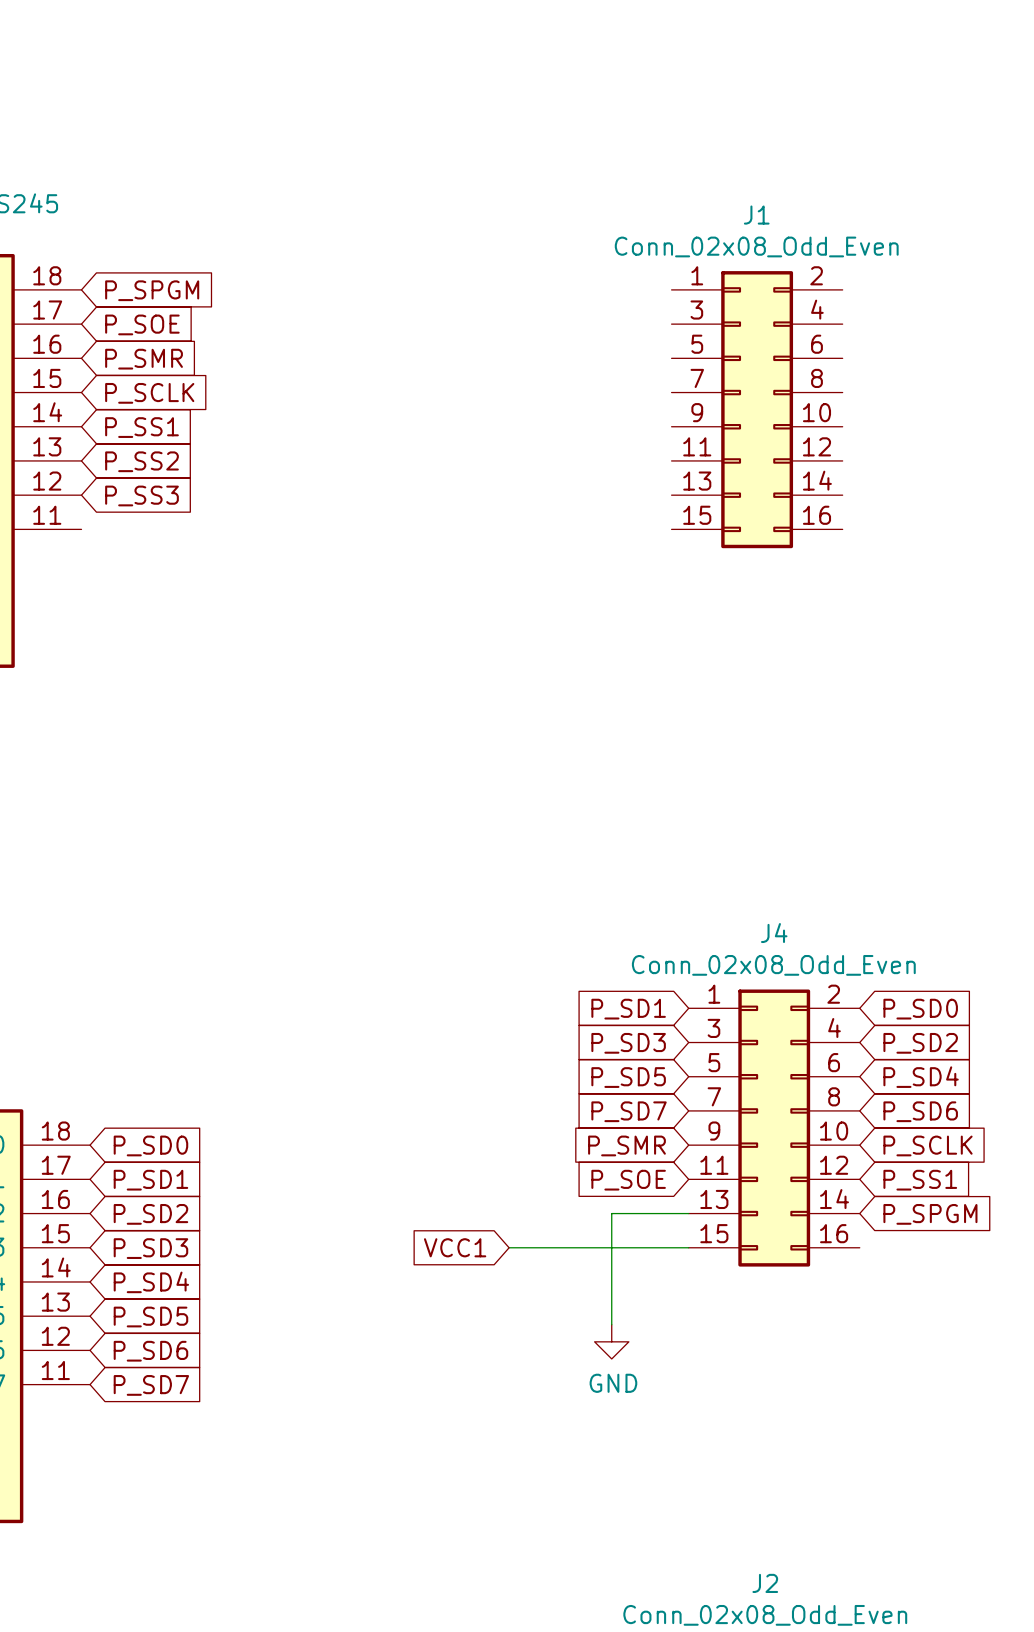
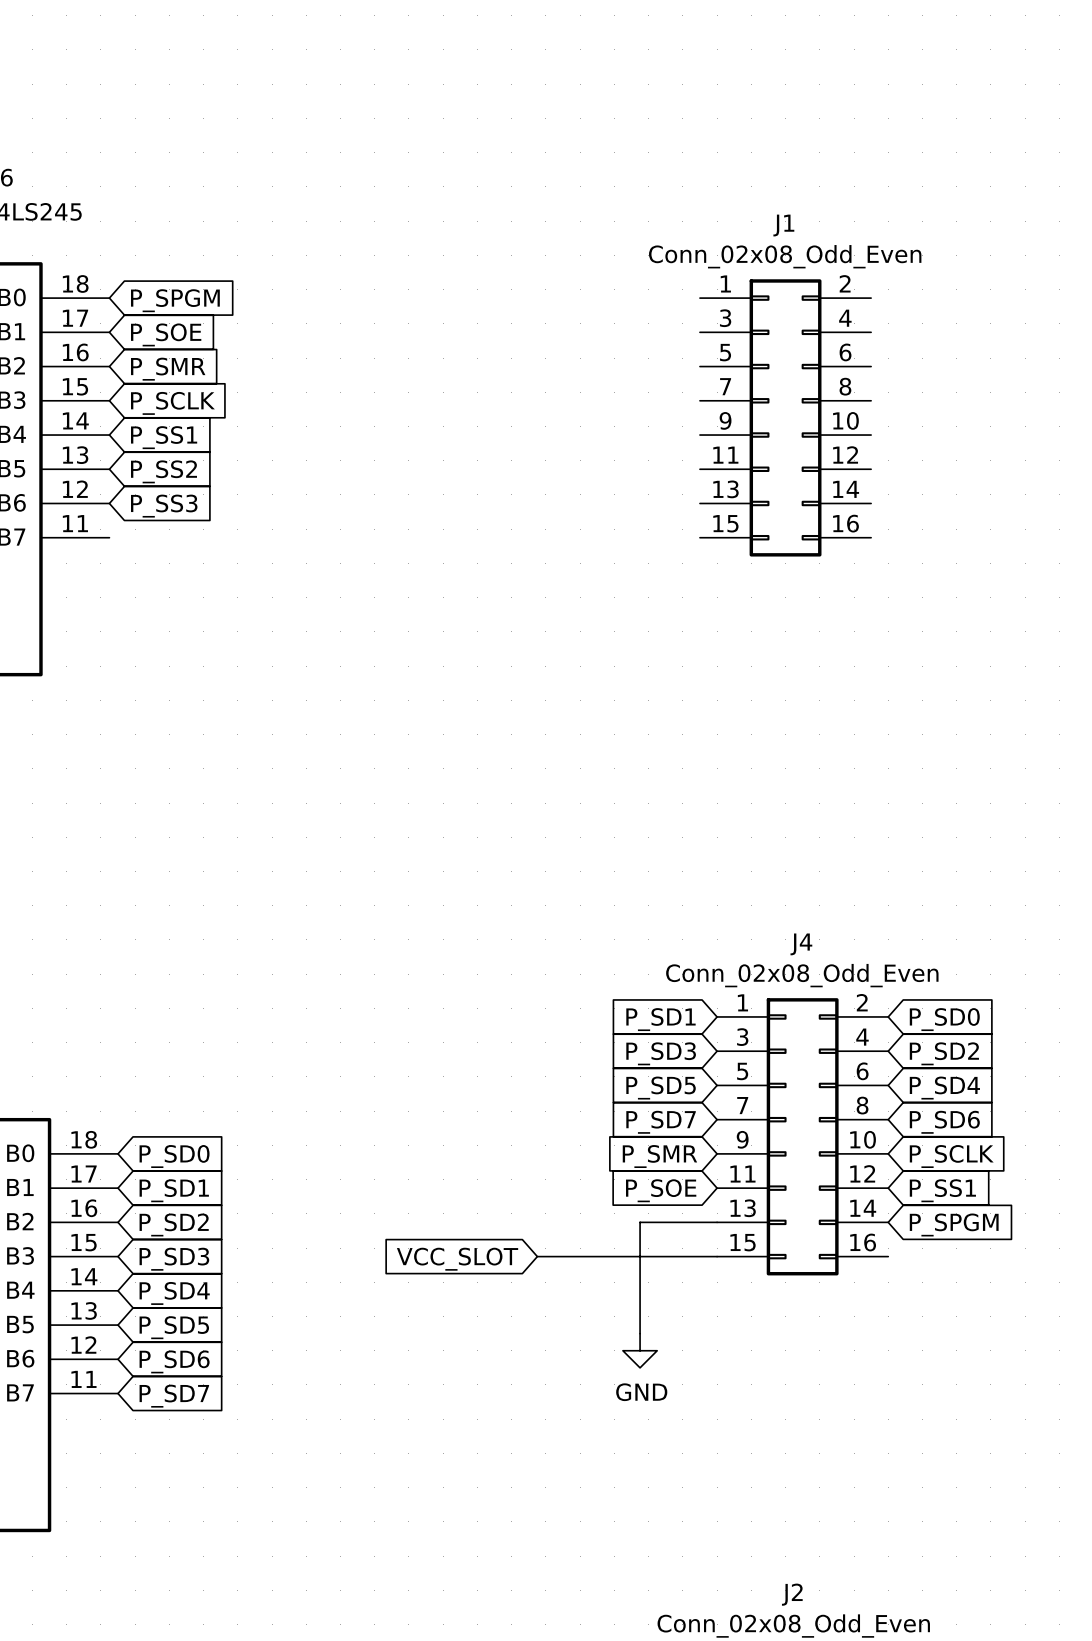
global label: VCC1 (455, 1247) -> VCC_SLOT (457, 1259)

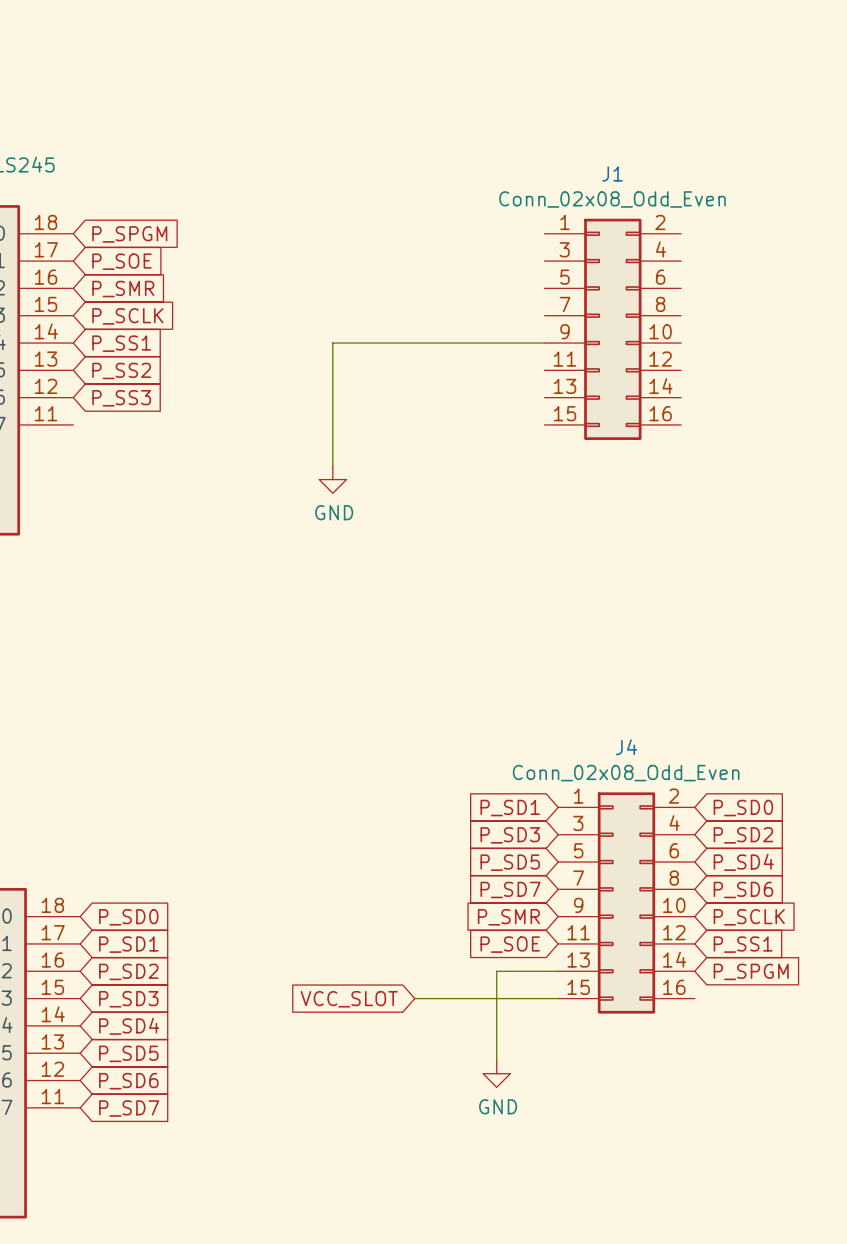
wire: none -> (544, 343) (332, 343) (332, 465)
power symbol: none -> GND (332, 479)

